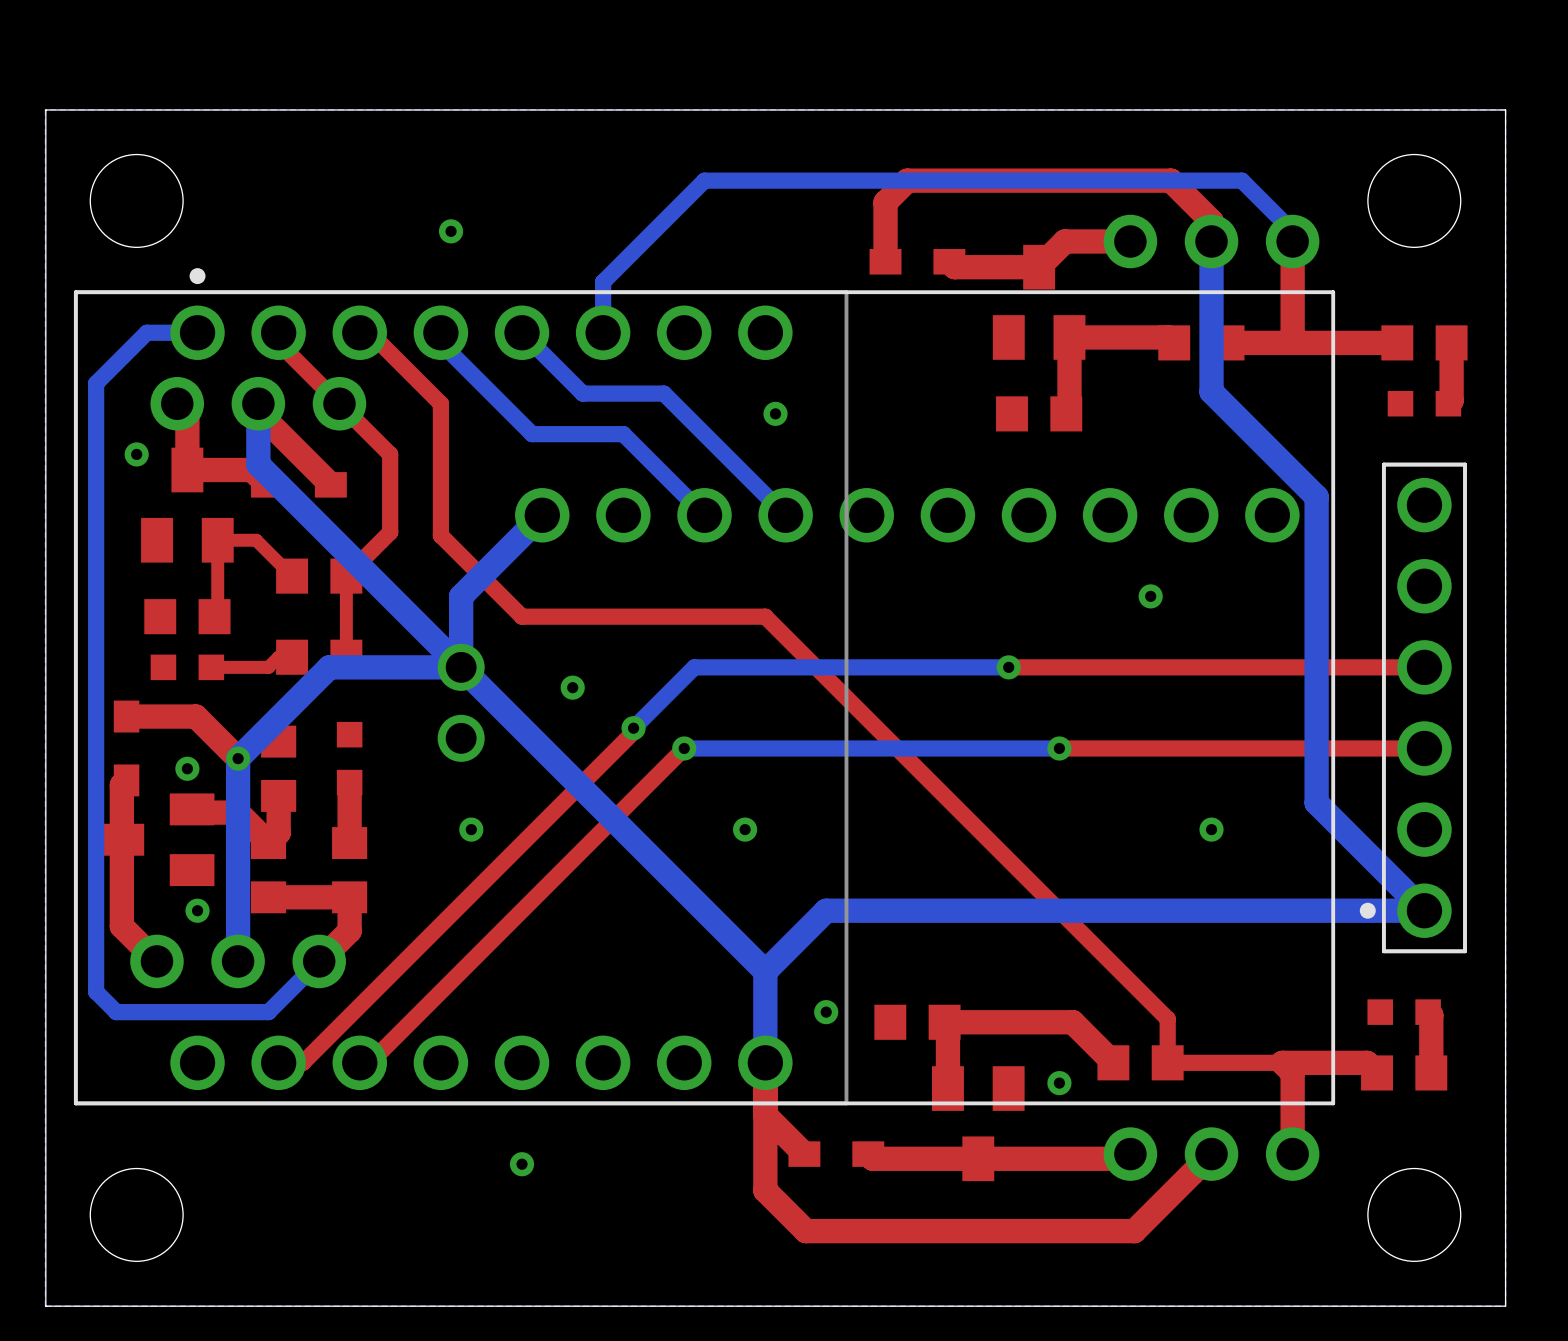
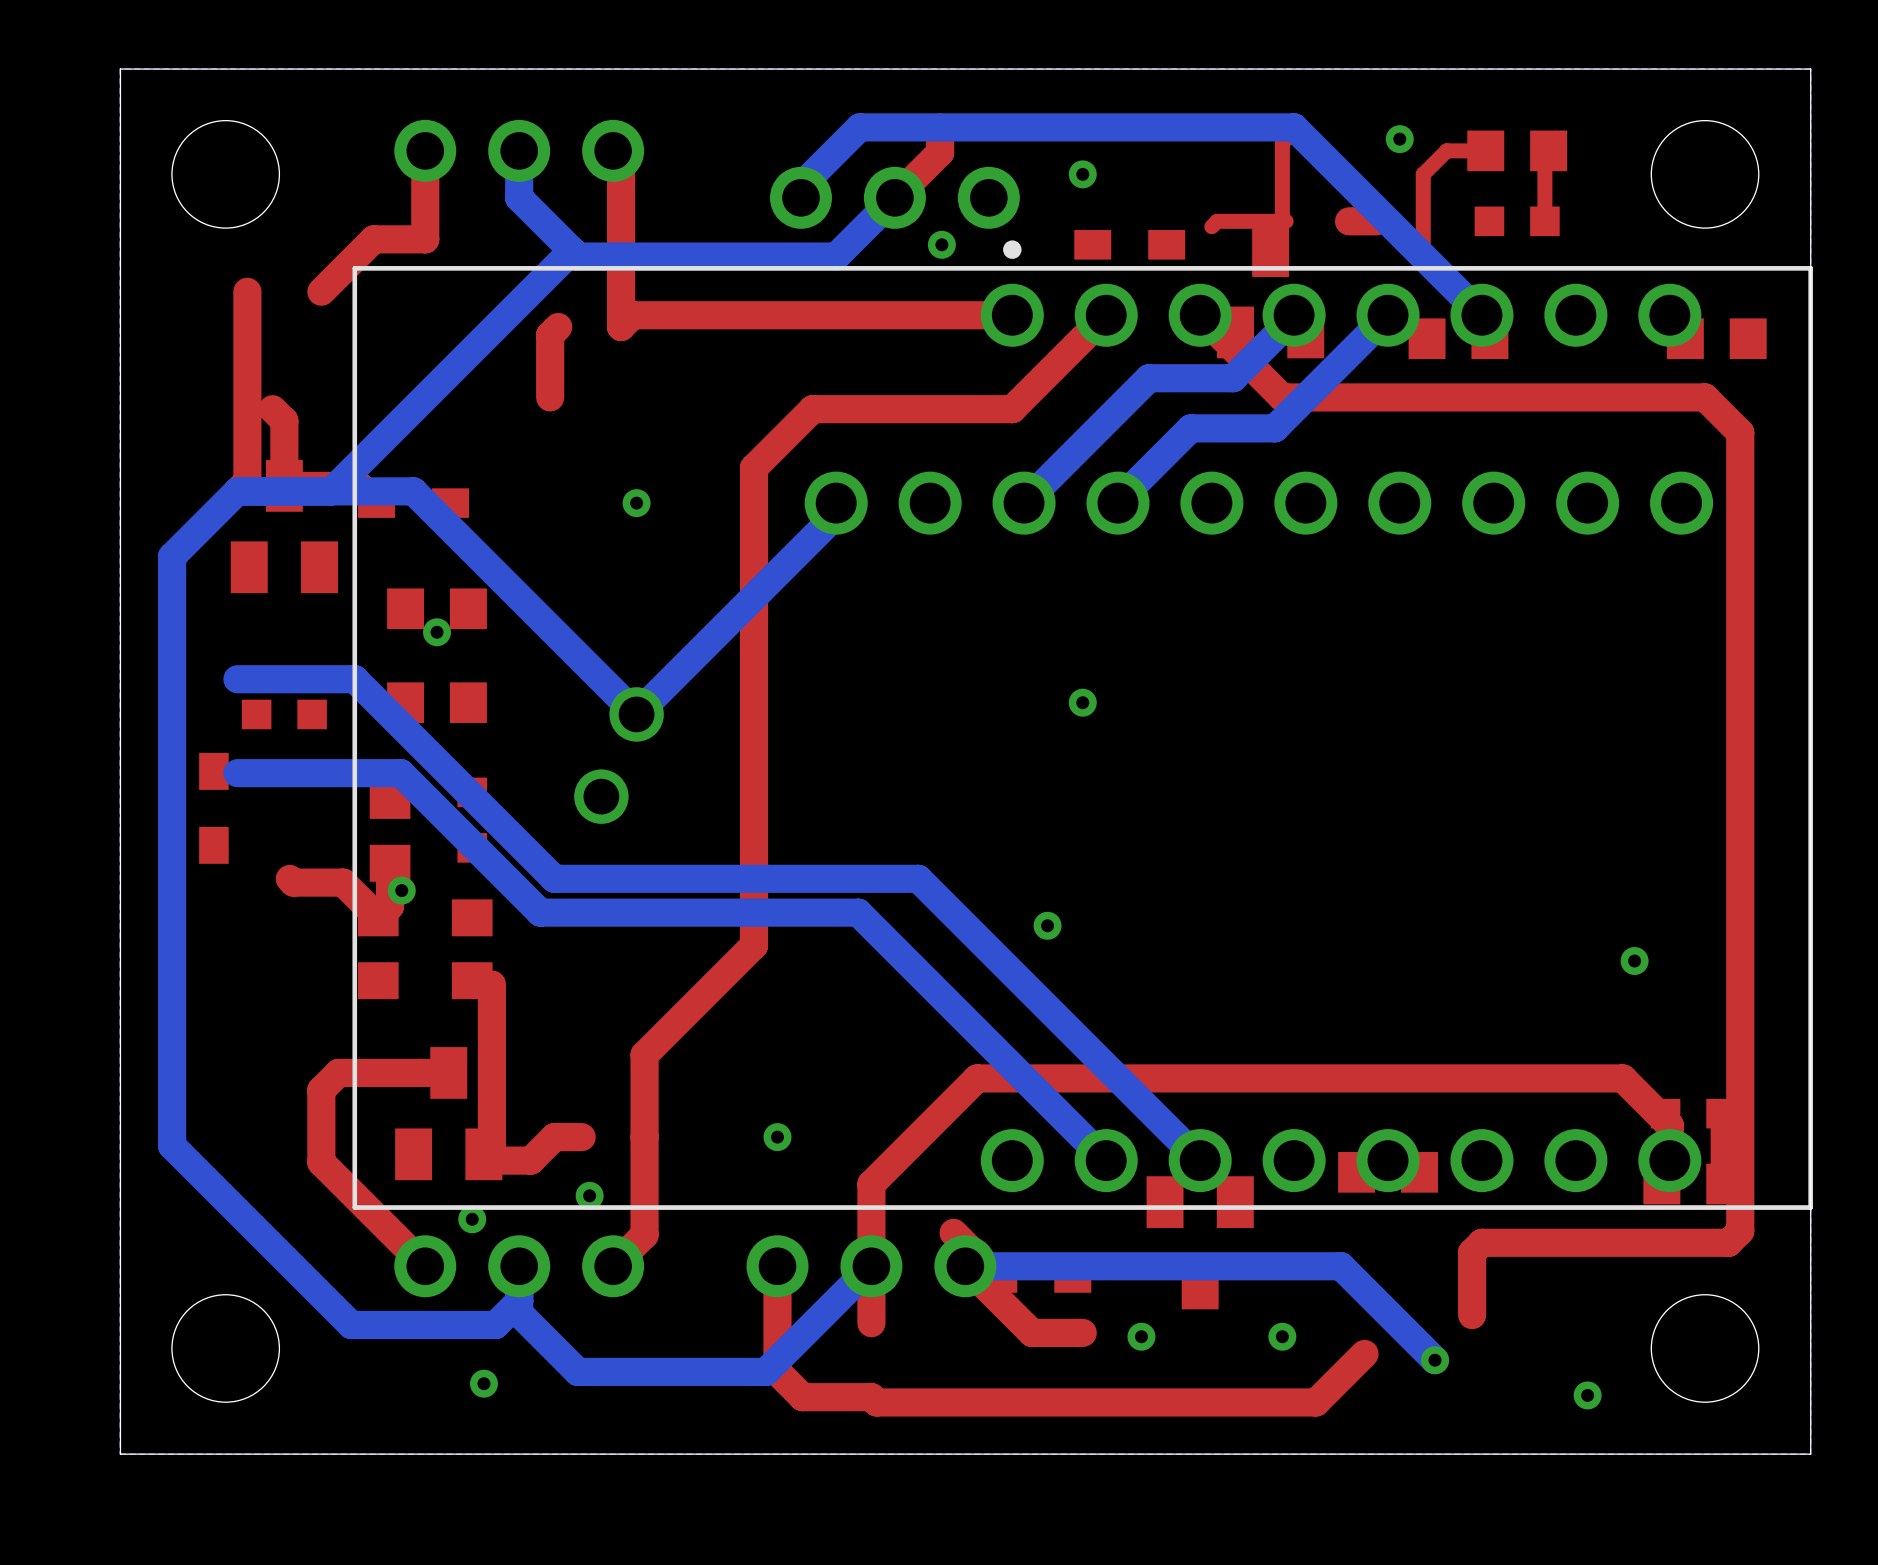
top track: none -> (940, 127) (940, 152) (894, 197)
top track: none -> (1286, 139) (1282, 142) (1282, 221)
via: none -> (1399, 139)
top track: none -> (425, 150) (425, 239) (373, 239) (321, 291)
bottom track: none -> (519, 150) (519, 197) (577, 256) (836, 256) (894, 197)
part: none -> (519, 150)
top track: none -> (613, 150) (621, 158) (621, 326) (632, 315) (1012, 315)
top track: none -> (1485, 150) (1446, 150) (1423, 174) (1423, 256) (1481, 315)
top track: none -> (1548, 150) (1544, 154) (1544, 221)
via: none -> (1082, 174)
bottom track: none -> (800, 197) (800, 186) (859, 127) (1294, 127) (1481, 315)
part: none -> (894, 197)
via: (451, 231) -> none
top track: none -> (1286, 221) (1217, 221) (1211, 226)
top track: (1106, 241) (1064, 241) (1039, 267) (954, 267) (949, 261) -> none
top track: (1211, 241) (1211, 221) (1170, 180) (907, 180) (885, 202) (885, 261) -> none
bottom track: (1211, 241) (1211, 391) (1316, 496) (1316, 802) (1424, 910) (826, 910) (765, 971) -> none
part: (1211, 241) -> none
top track: (1292, 241) (1292, 342) -> none
bottom track: (1292, 241) (1292, 231) (1241, 180) (704, 180) (603, 282) (603, 332) -> none
via: none -> (941, 244)
bottom track: none -> (572, 250) (331, 491)
top track: none -> (247, 291) (247, 481) (237, 491)
top track: none -> (1106, 315) (1012, 409) (812, 409) (754, 467) (754, 945) (644, 1054) (644, 1234) (613, 1266)
top track: none -> (1200, 315) (1282, 397) (1705, 397) (1740, 432) (1740, 1231) (1728, 1242) (1481, 1242) (1472, 1252) (1472, 1315)
bottom track: none -> (1294, 315) (1233, 378) (1148, 378) (1024, 503)
bottom track: none -> (1388, 315) (1274, 428) (1190, 428) (1117, 503)
bottom track: (197, 332) (146, 332) (96, 383) (96, 991) (116, 1012) (268, 1012) (319, 961) -> none
top track: (278, 332) (278, 342) (390, 454) (390, 532) (346, 576) (346, 657) -> none
top track: (359, 332) (369, 332) (440, 403) (440, 535) (522, 616) (765, 616) (1167, 1018) (1167, 1062) (1282, 1062) -> none
top track: none -> (558, 326) (550, 335) (550, 397)
bottom track: (440, 332) (440, 342) (532, 434) (623, 434) (704, 515) -> none
bottom track: (522, 332) (582, 393) (663, 393) (785, 515) -> none
top track: (1174, 342) (1168, 337) (1069, 337) (1069, 410) (1066, 413) -> none
top track: (1397, 342) (1228, 342) -> none
top track: (1451, 342) (1451, 400) (1448, 403) -> none
top track: (258, 403) (258, 412) (330, 484) -> none
bottom track: (258, 403) (258, 464) (765, 971) -> none
part: (258, 403) -> none
part position: (1424, 403) -> (1517, 221)
via: (775, 413) -> none
part position: (1039, 413) -> (1517, 150)
via: (136, 454) -> none
via: none -> (636, 503)
bottom track: none -> (836, 503) (836, 514) (636, 714) (413, 491) (237, 491) (172, 556) (172, 1145) (351, 1324) (495, 1324) (519, 1301)
bottom track: (542, 515) (461, 596) (461, 667) (329, 667) (238, 758) (238, 961) -> none
part position: (907, 515) -> (1258, 503)
top track: (292, 576) (256, 540) (217, 540) (217, 613) (214, 616) -> none
via: none -> (437, 632)
via: (1150, 596) -> none
part: (187, 616) -> none
bottom track: none -> (237, 679) (354, 679) (554, 878) (918, 878) (1200, 1160)
top track: (292, 657) (278, 657) (268, 667) (211, 667) -> none
via: none -> (1082, 702)
part position: (461, 667) -> (636, 714)
bottom track: (1008, 667) (694, 667) (633, 728) -> none
via: (1008, 667) -> none
top track: (1424, 667) (1008, 667) -> none
part: none -> (1082, 725)
part: (704, 686) -> none
via: (572, 687) -> none
part: (1413, 707) -> none
top track: (126, 716) (196, 716) (238, 758) -> none
bottom track: none -> (237, 773) (400, 773) (540, 912) (858, 912) (1106, 1160)
top track: (633, 728) (633, 732) (302, 1062) (278, 1062) -> none
via: (633, 728) -> none
top track: (684, 748) (369, 1062) (359, 1062) -> none
via: (684, 748) -> none
bottom track: (1059, 748) (684, 748) -> none
via: (1059, 748) -> none
top track: (1424, 748) (1059, 748) -> none
via: (238, 758) -> none
via: (187, 768) -> none
top track: (126, 780) (121, 785) (121, 926) (156, 961) -> none
top track: (349, 782) (349, 843) -> none
via: none -> (401, 890)
via: (471, 829) -> none
via: (745, 829) -> none
via position: (1211, 829) -> (1634, 961)
part rotation: 0° (156, 839) -> 90° clockwise (448, 1113)
part position: (156, 839) -> (448, 1113)
via: none -> (1047, 925)
top track: (268, 897) (349, 897) (349, 931) (319, 961) -> none
top track: none -> (491, 984) (491, 1146) (483, 1154) (490, 1160) (530, 1160) (554, 1137) (581, 1137)
via: (197, 910) -> none
part position: (238, 961) -> (519, 1266)
bottom track: (765, 971) (765, 1062) -> none
top track: none -> (448, 1072) (338, 1072) (321, 1090) (321, 1162) (425, 1266)
via: (826, 1012) -> none
part: (917, 1022) -> none
via: none -> (777, 1137)
top track: none -> (1669, 1160) (1669, 1125) (1622, 1078) (977, 1078) (871, 1184) (871, 1323)
top track: (765, 1062) (765, 1190) (805, 1231) (1134, 1231) (1211, 1154) -> none
top track: (1113, 1062) (1072, 1022) (944, 1022) (947, 1025) (947, 1088) -> none
top track: (1282, 1062) (1366, 1062) (1377, 1072) -> none
top track: (1282, 1062) (1292, 1072) (1292, 1154) -> none
via: none -> (589, 1195)
via: (1059, 1083) -> none
via: none -> (472, 1219)
top track: none -> (777, 1266) (777, 1371) (802, 1397) (871, 1397) (876, 1402) (1316, 1402) (1364, 1353)
bottom track: none -> (871, 1266) (765, 1371) (577, 1371) (519, 1313) (519, 1266)
part: none -> (871, 1266)
top track: none -> (965, 1266) (1032, 1332) (1082, 1332)
bottom track: none -> (965, 1266) (1341, 1266) (1435, 1360)
top track: (1130, 1154) (1125, 1158) (872, 1158) (868, 1154) -> none
part: (1211, 1154) -> none
via: (522, 1164) -> none
via: none -> (1141, 1336)
via: none -> (1282, 1336)
via: none -> (1435, 1360)
via: none -> (483, 1383)
via: none -> (1587, 1395)

